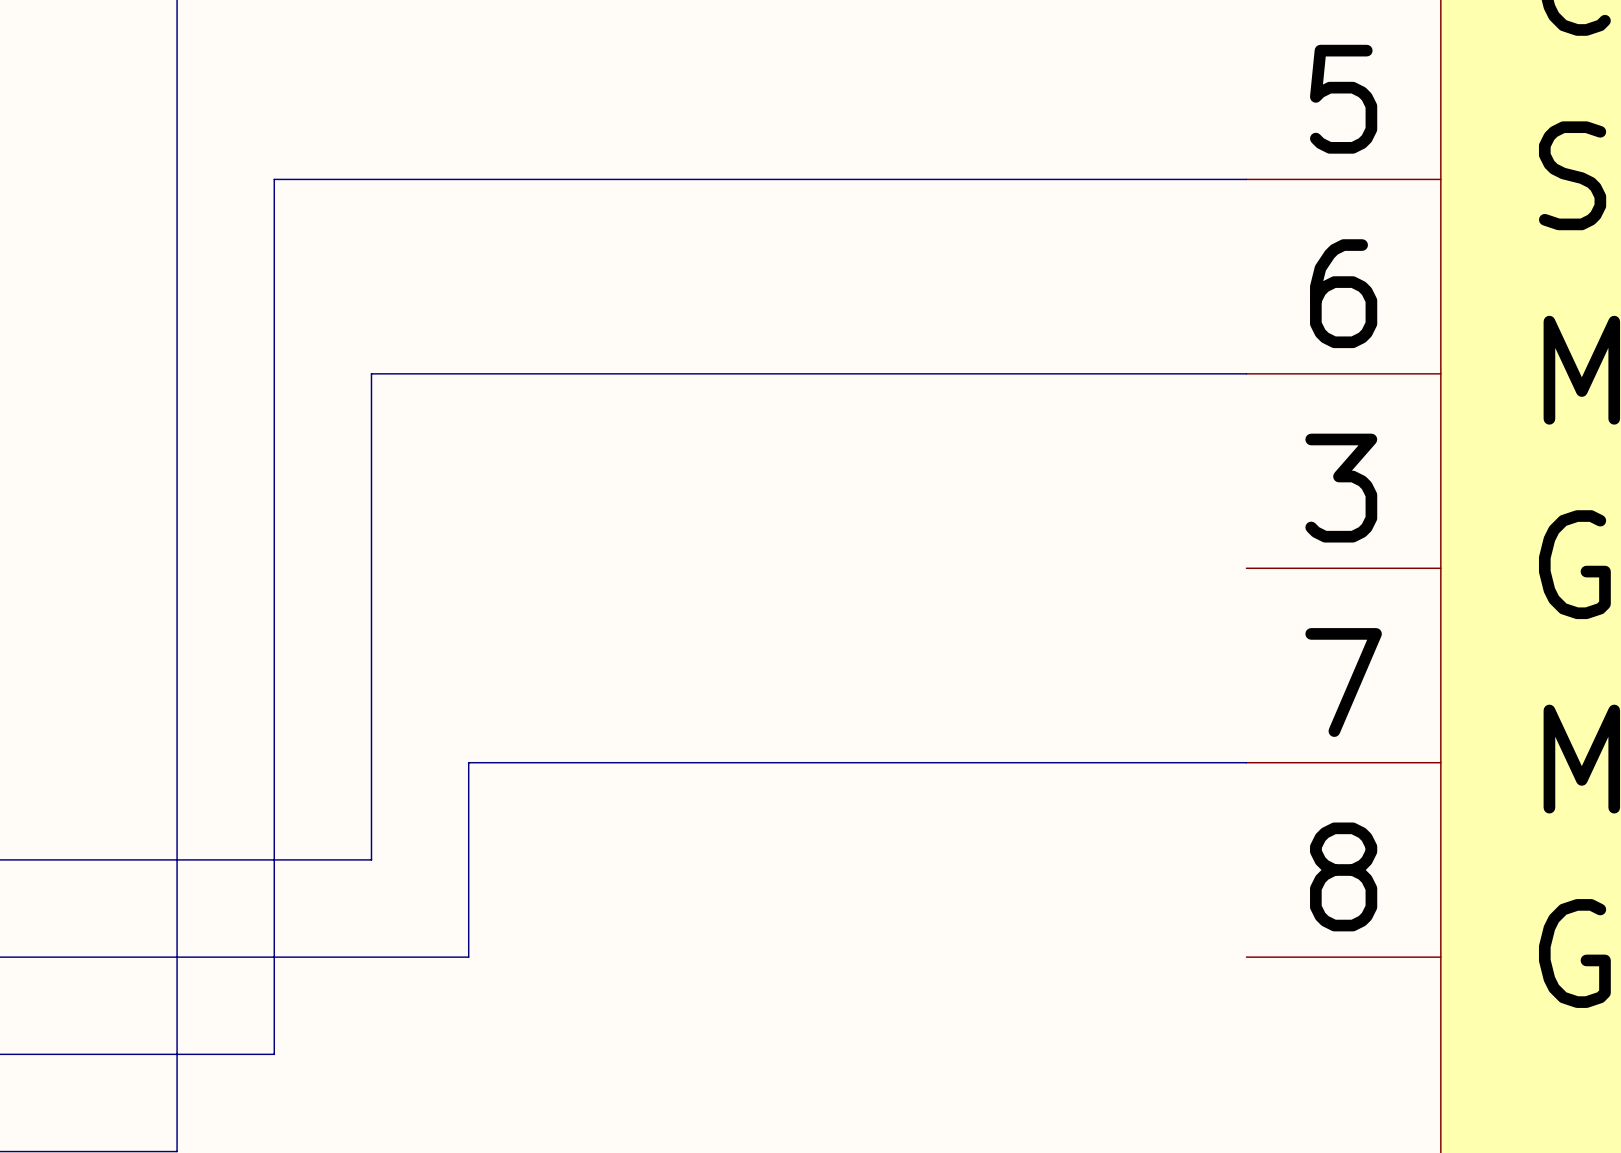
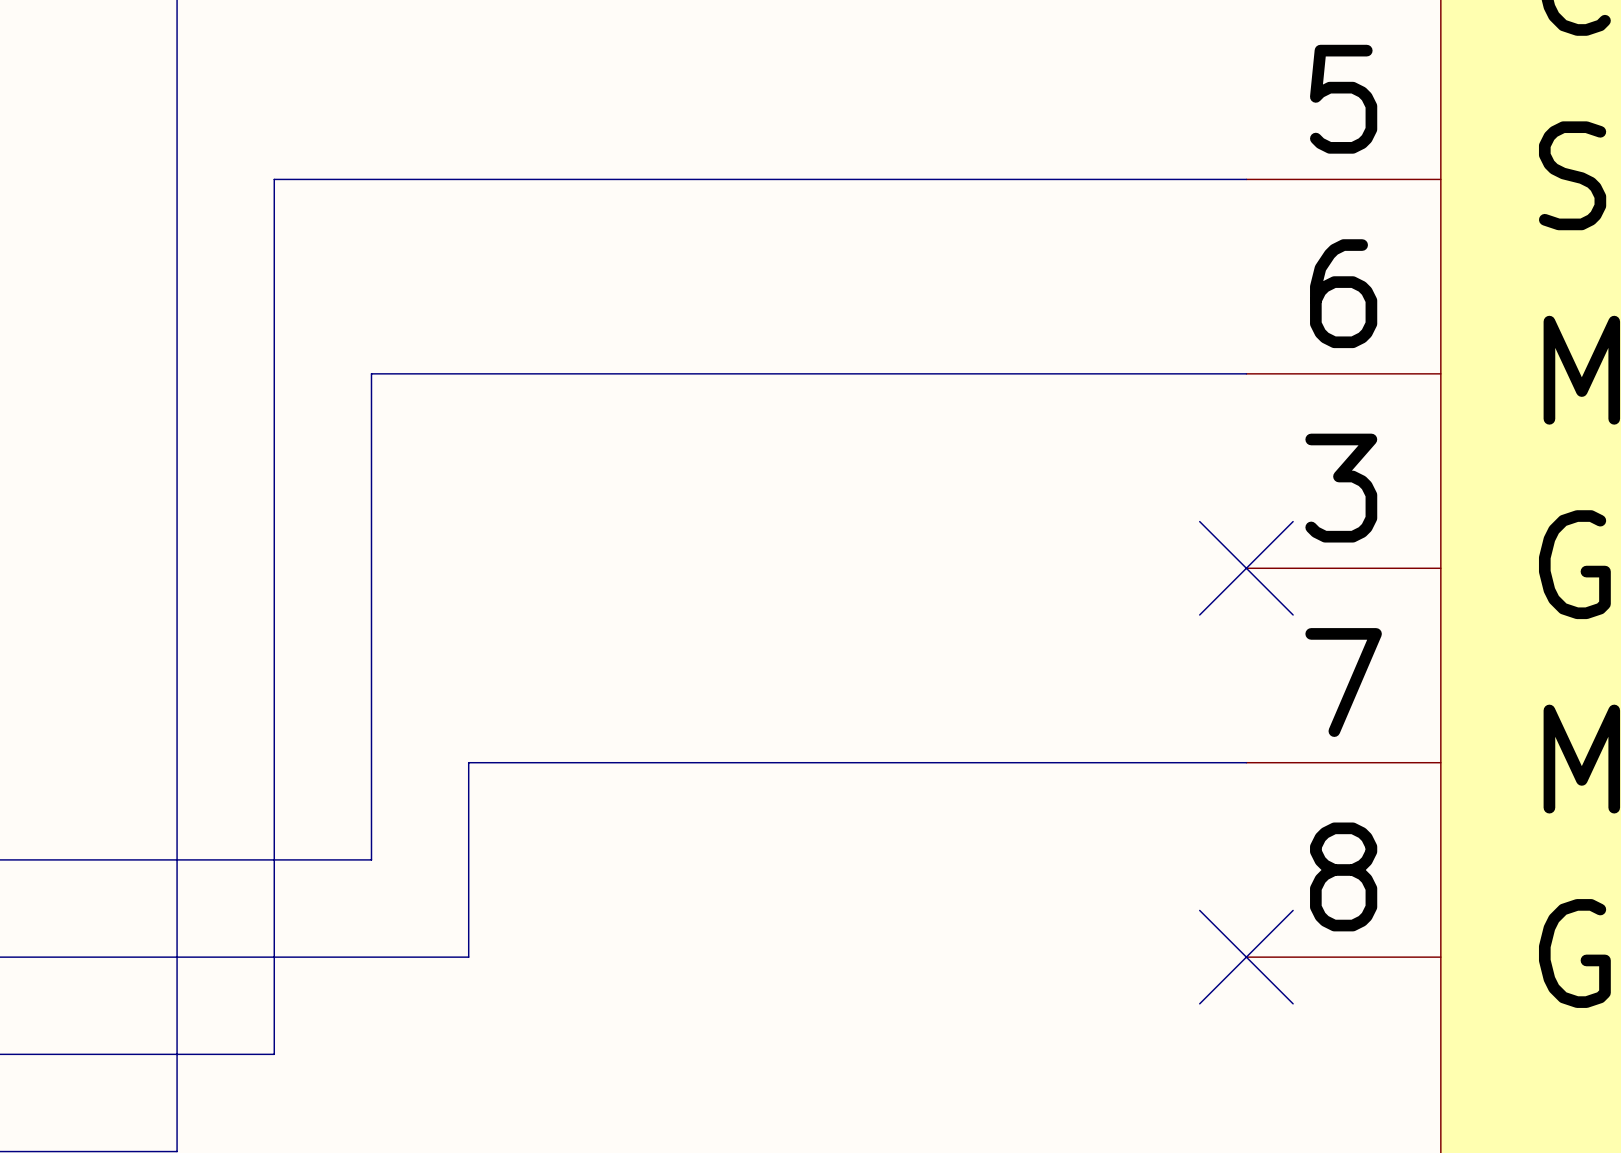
no-connect mark: none -> (1246, 568)
no-connect mark: none -> (1246, 957)

